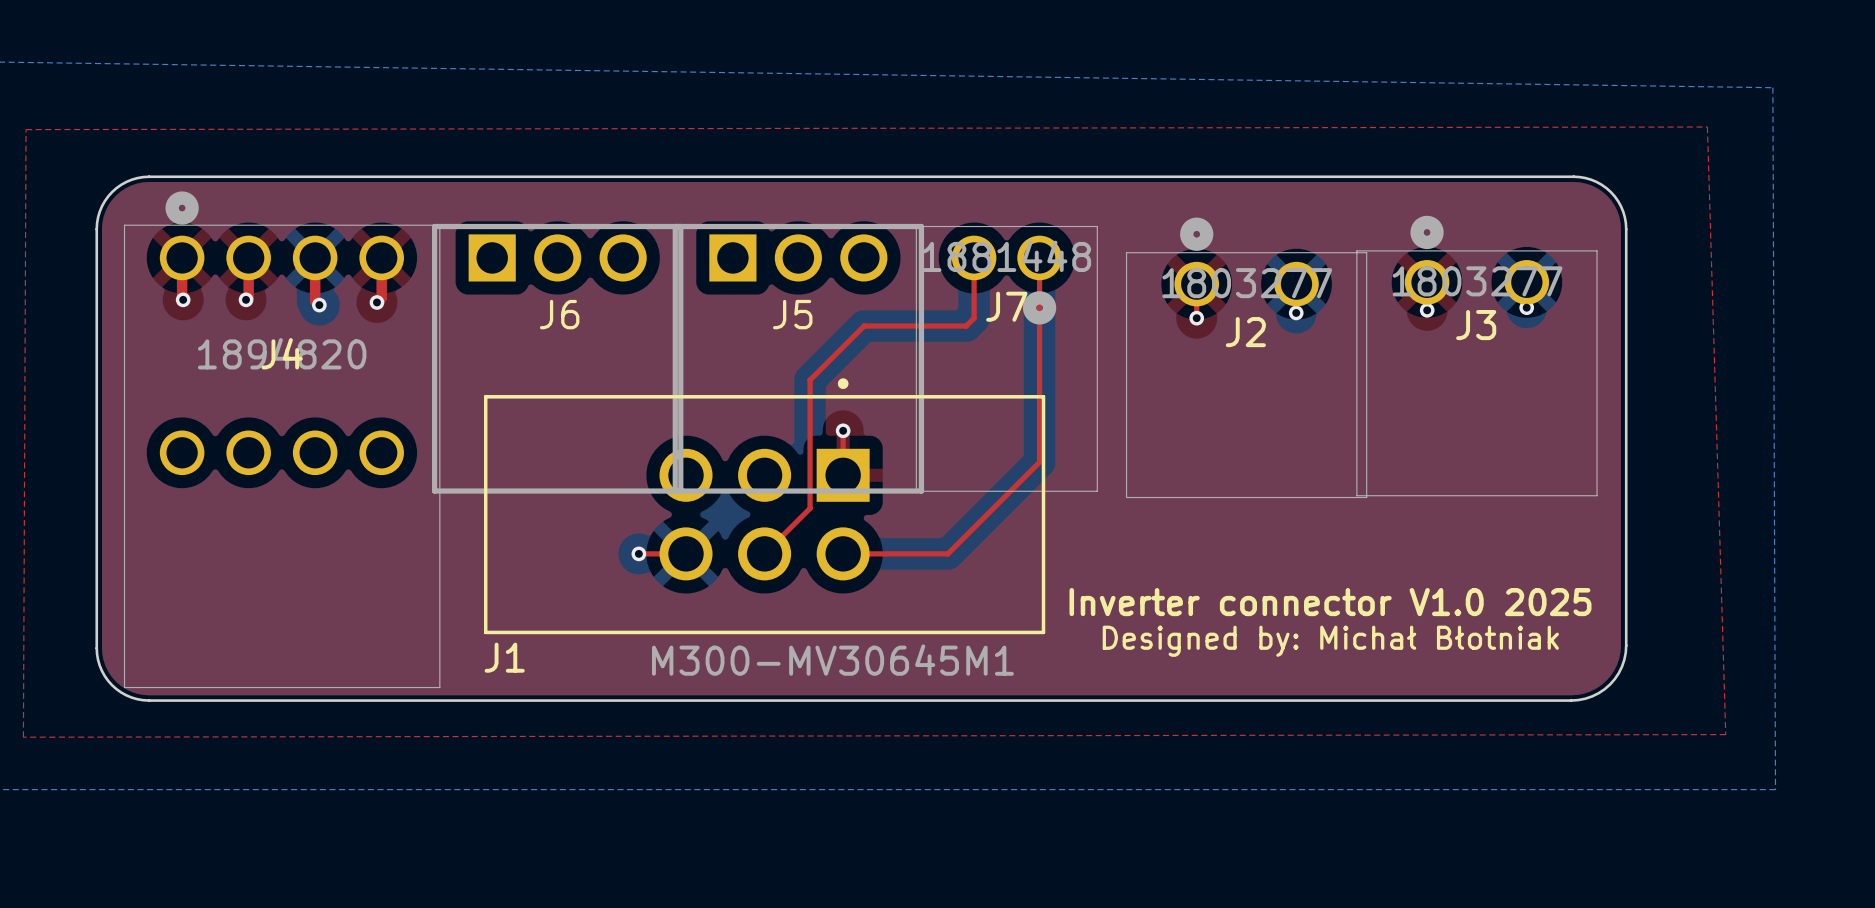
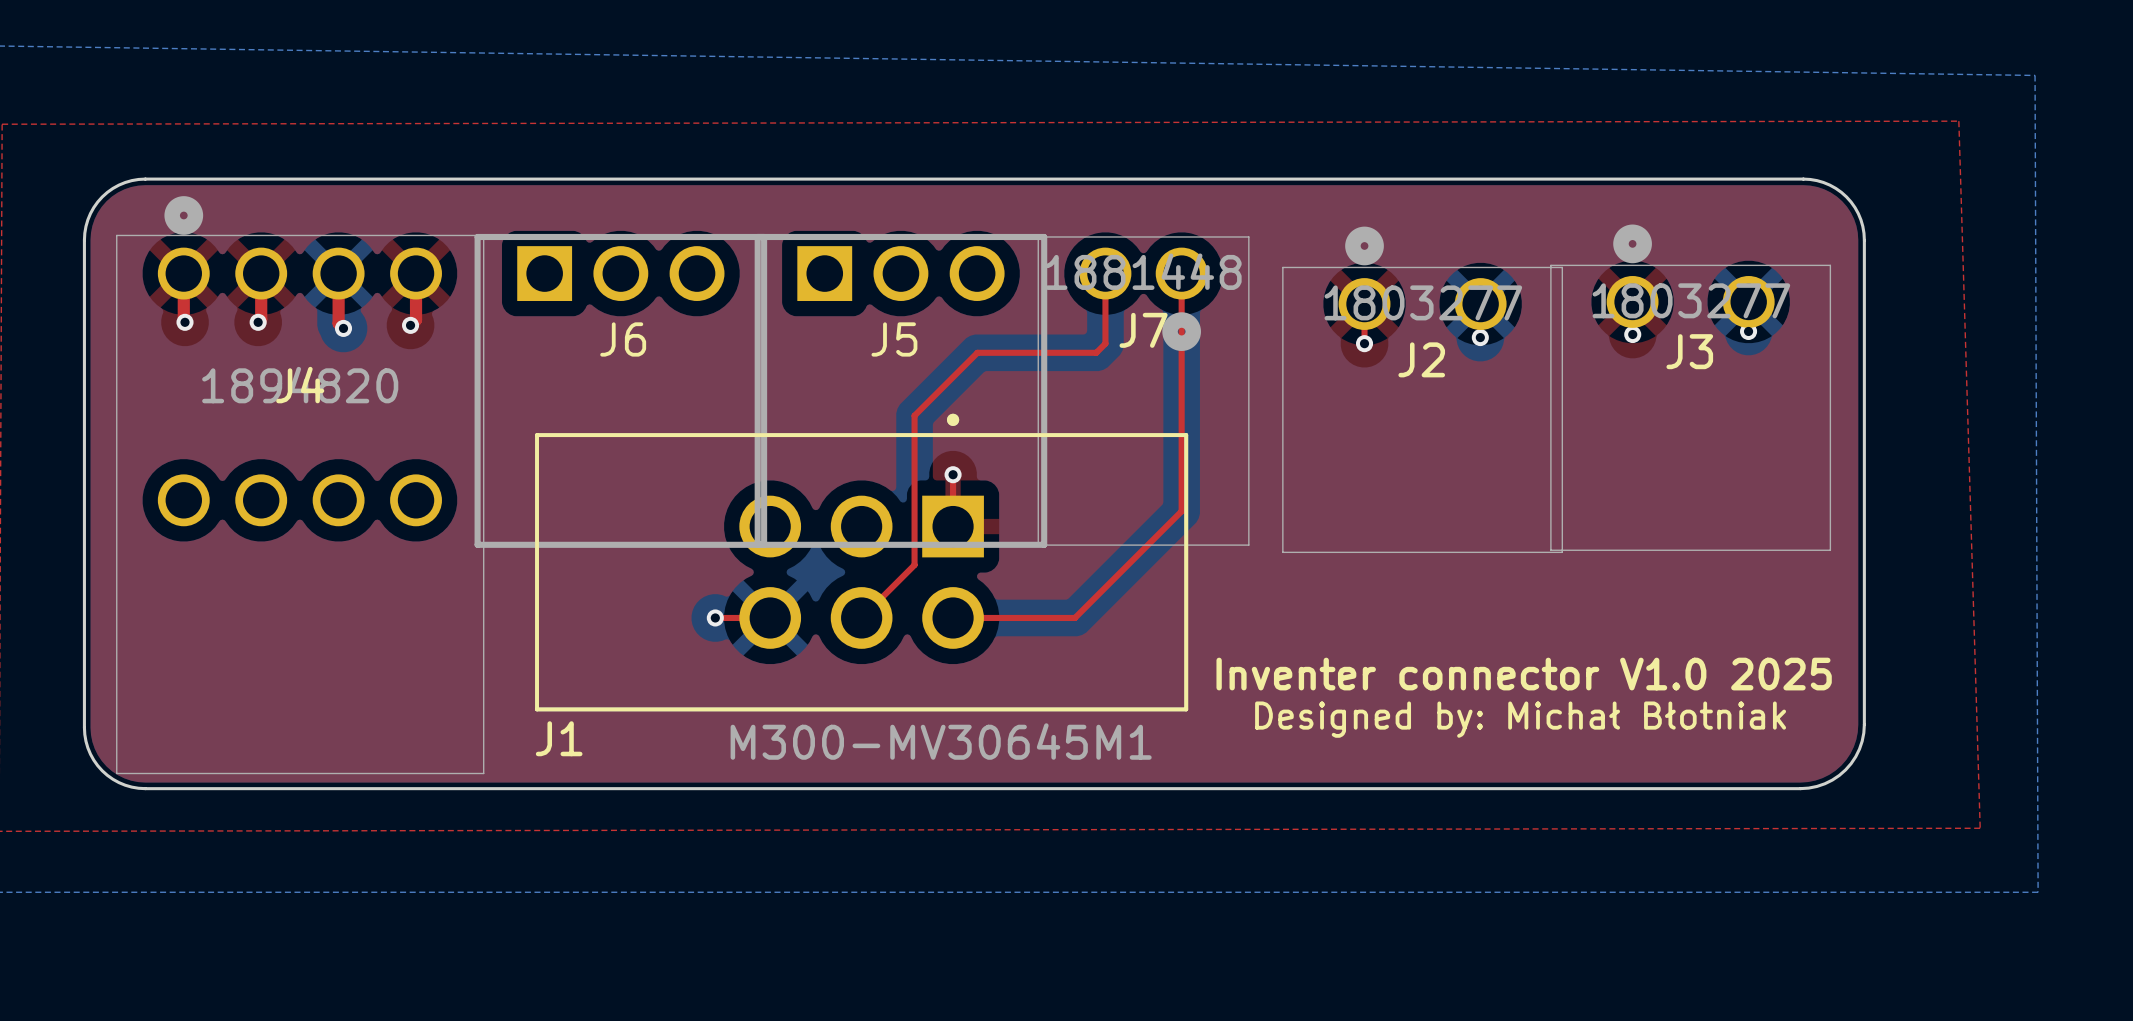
text: Inverter connector V1.0 2025 (1330, 602) -> Inventer connector V1.0 2025 (1524, 674)

